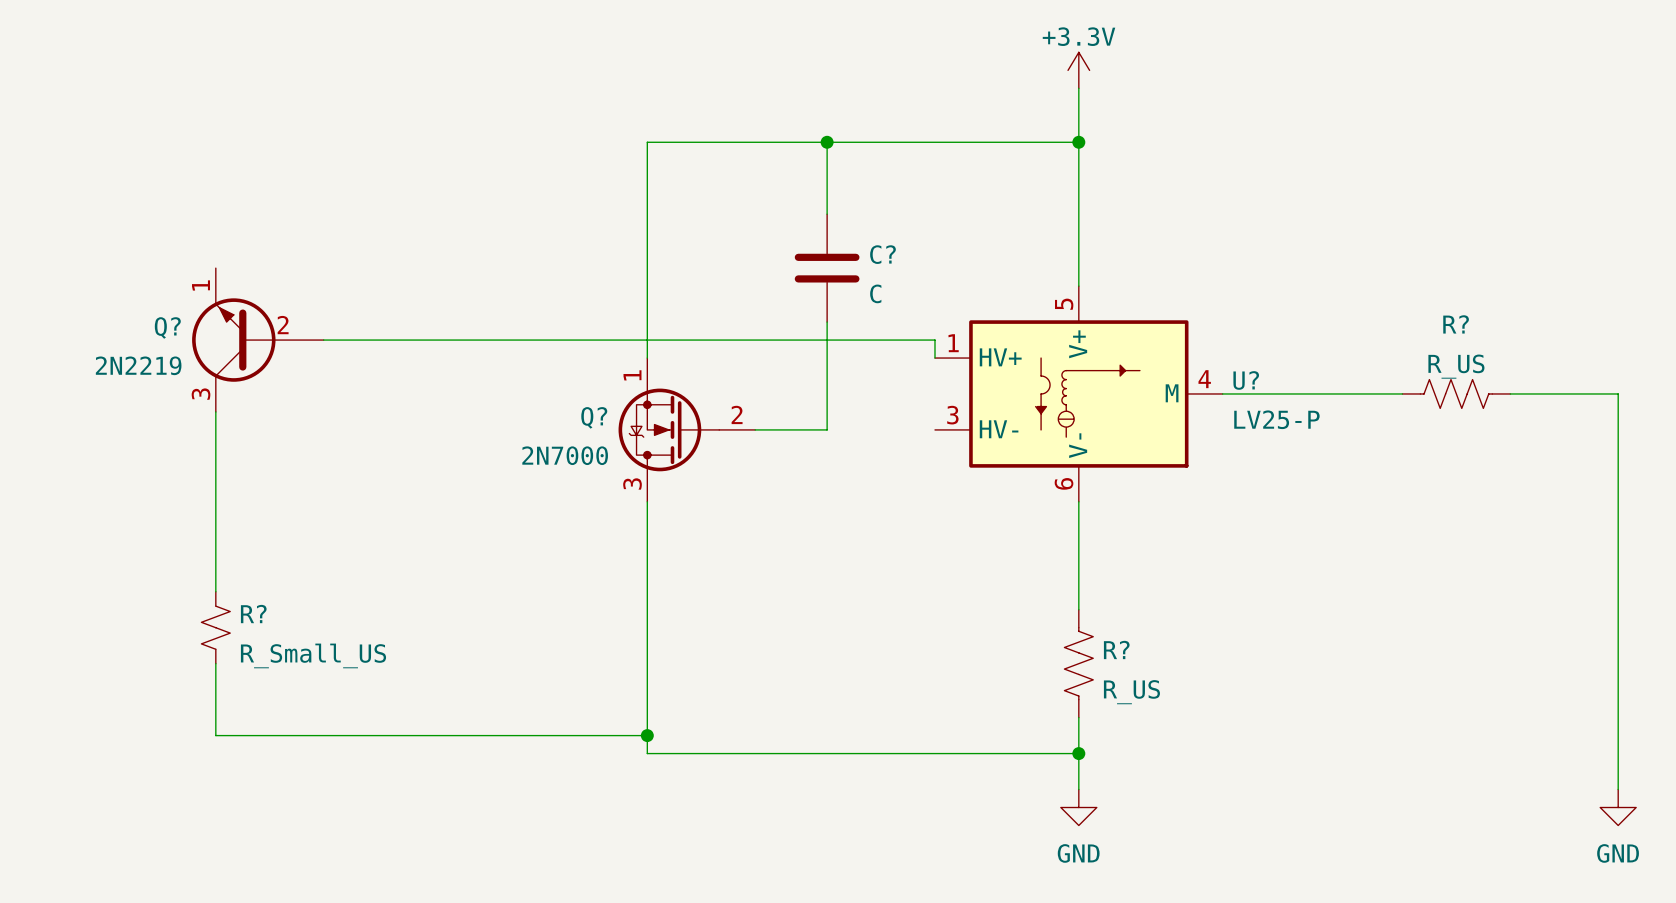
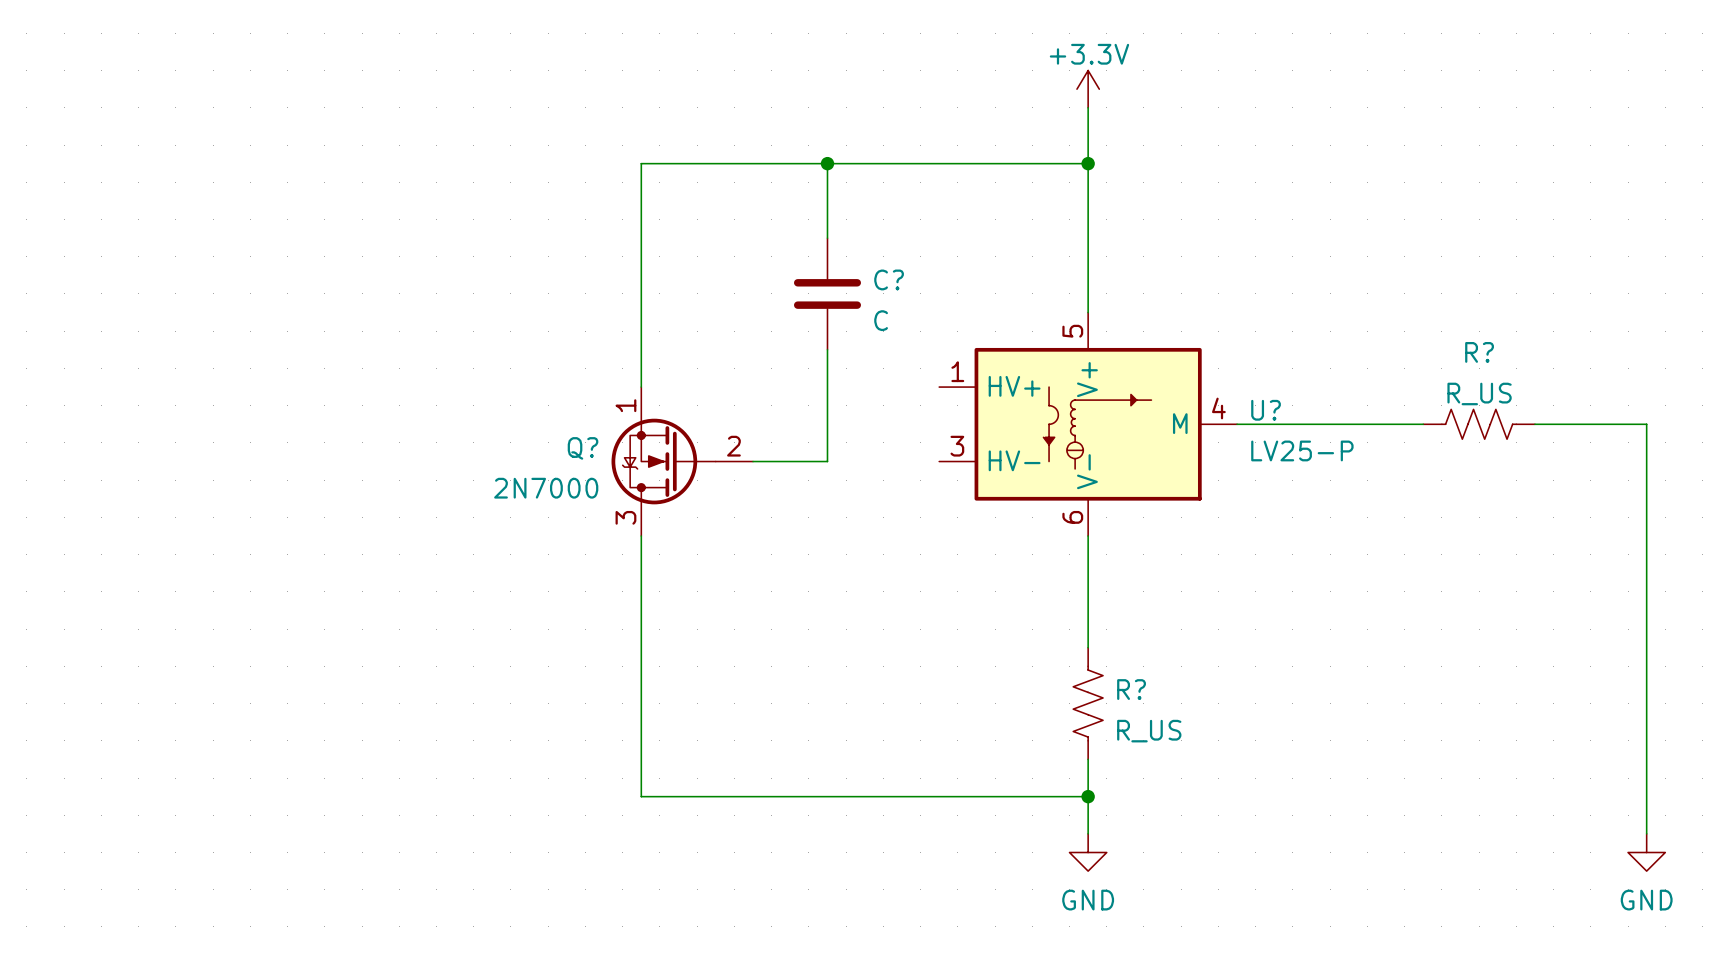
Q?: 2N2219 (257, 340) -> none
wire: (323, 340) (934, 340) (934, 358) -> none
wire: (215, 411) (215, 591) -> none
R?: R_Small_US (215, 627) -> none
wire: (215, 663) (215, 735) (647, 735) -> none
junction: (647, 735) -> none

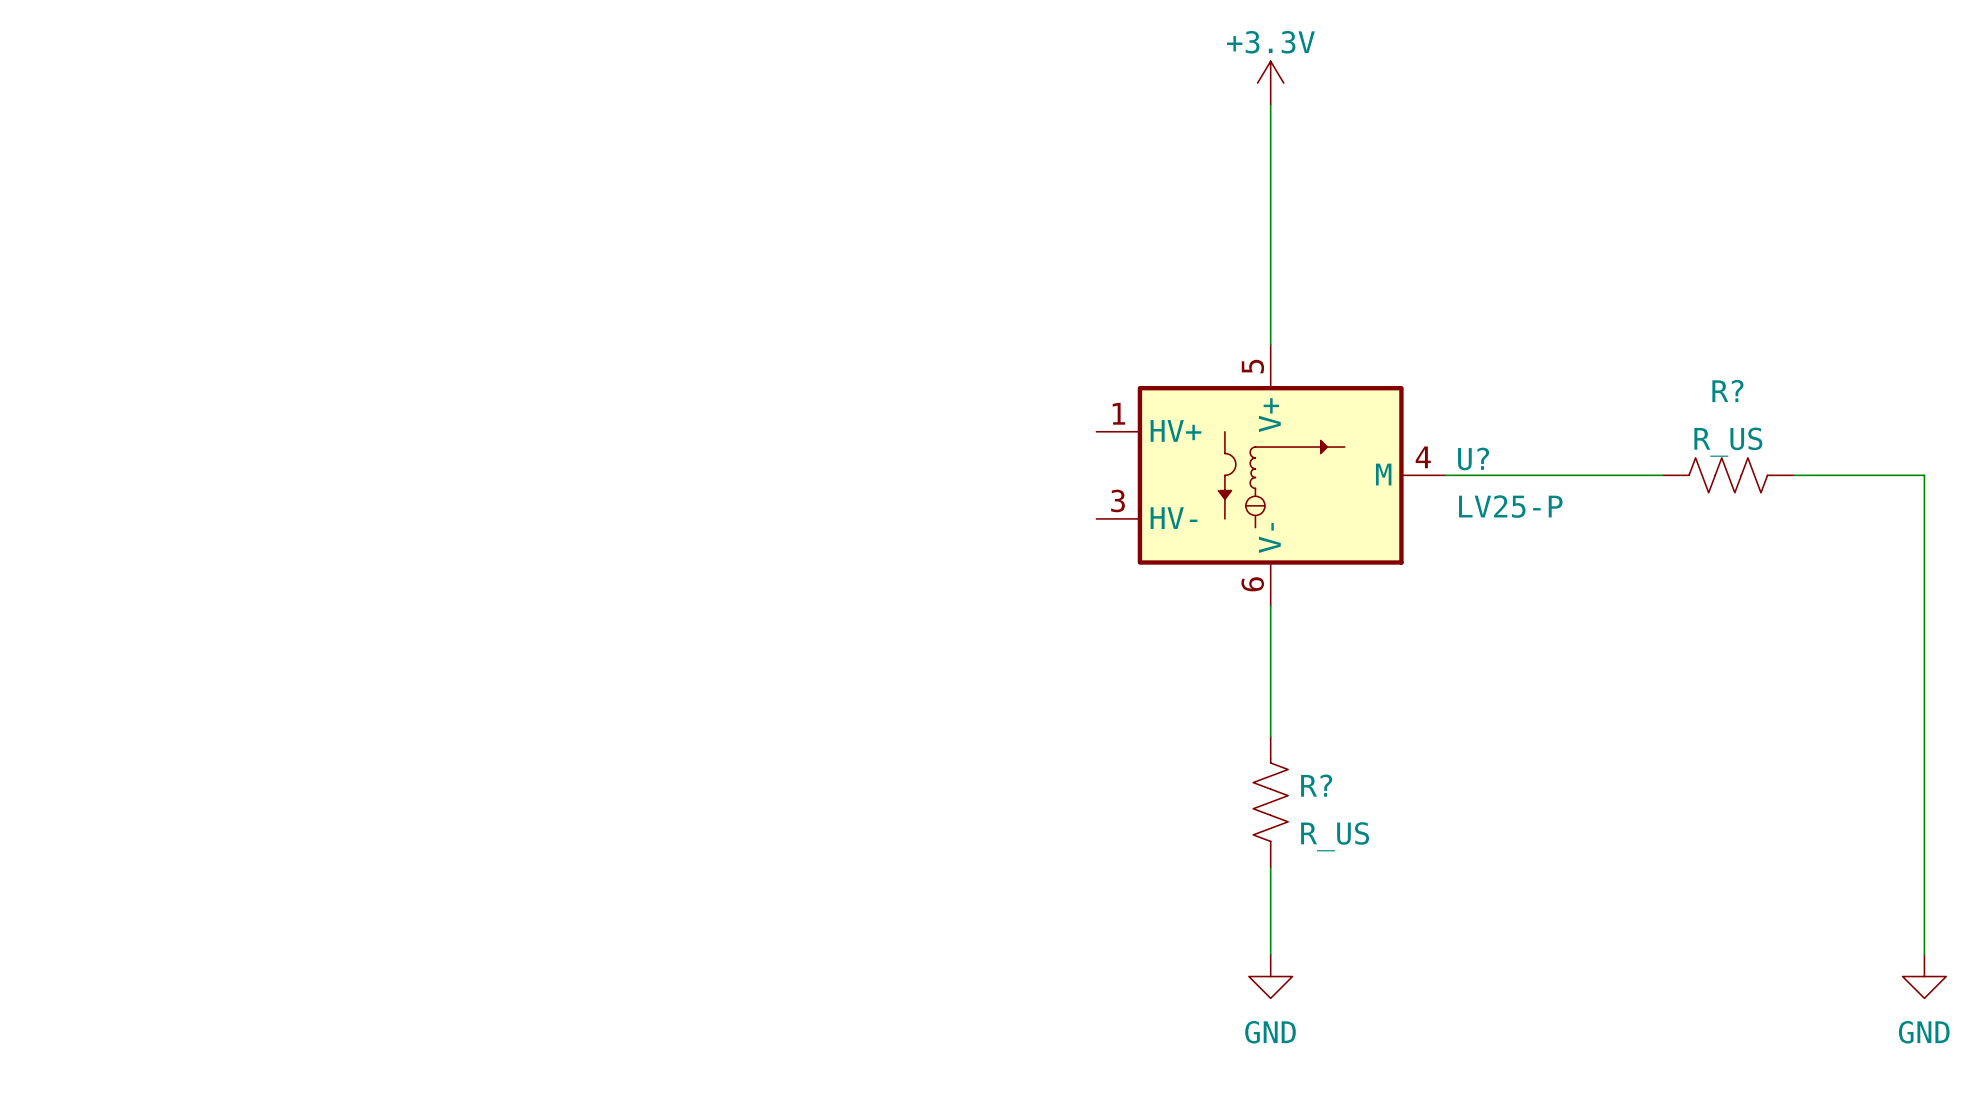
wire: (827, 163) (827, 238) -> none
junction: (827, 163) -> none
wire: (1088, 163) (641, 163) (641, 387) -> none
junction: (1088, 163) -> none
C?: C (827, 293) -> none
wire: (827, 349) (827, 461) (753, 461) -> none
Q?: 2N7000 (682, 461) -> none
wire: (641, 536) (641, 796) (1088, 796) -> none
junction: (1088, 796) -> none

